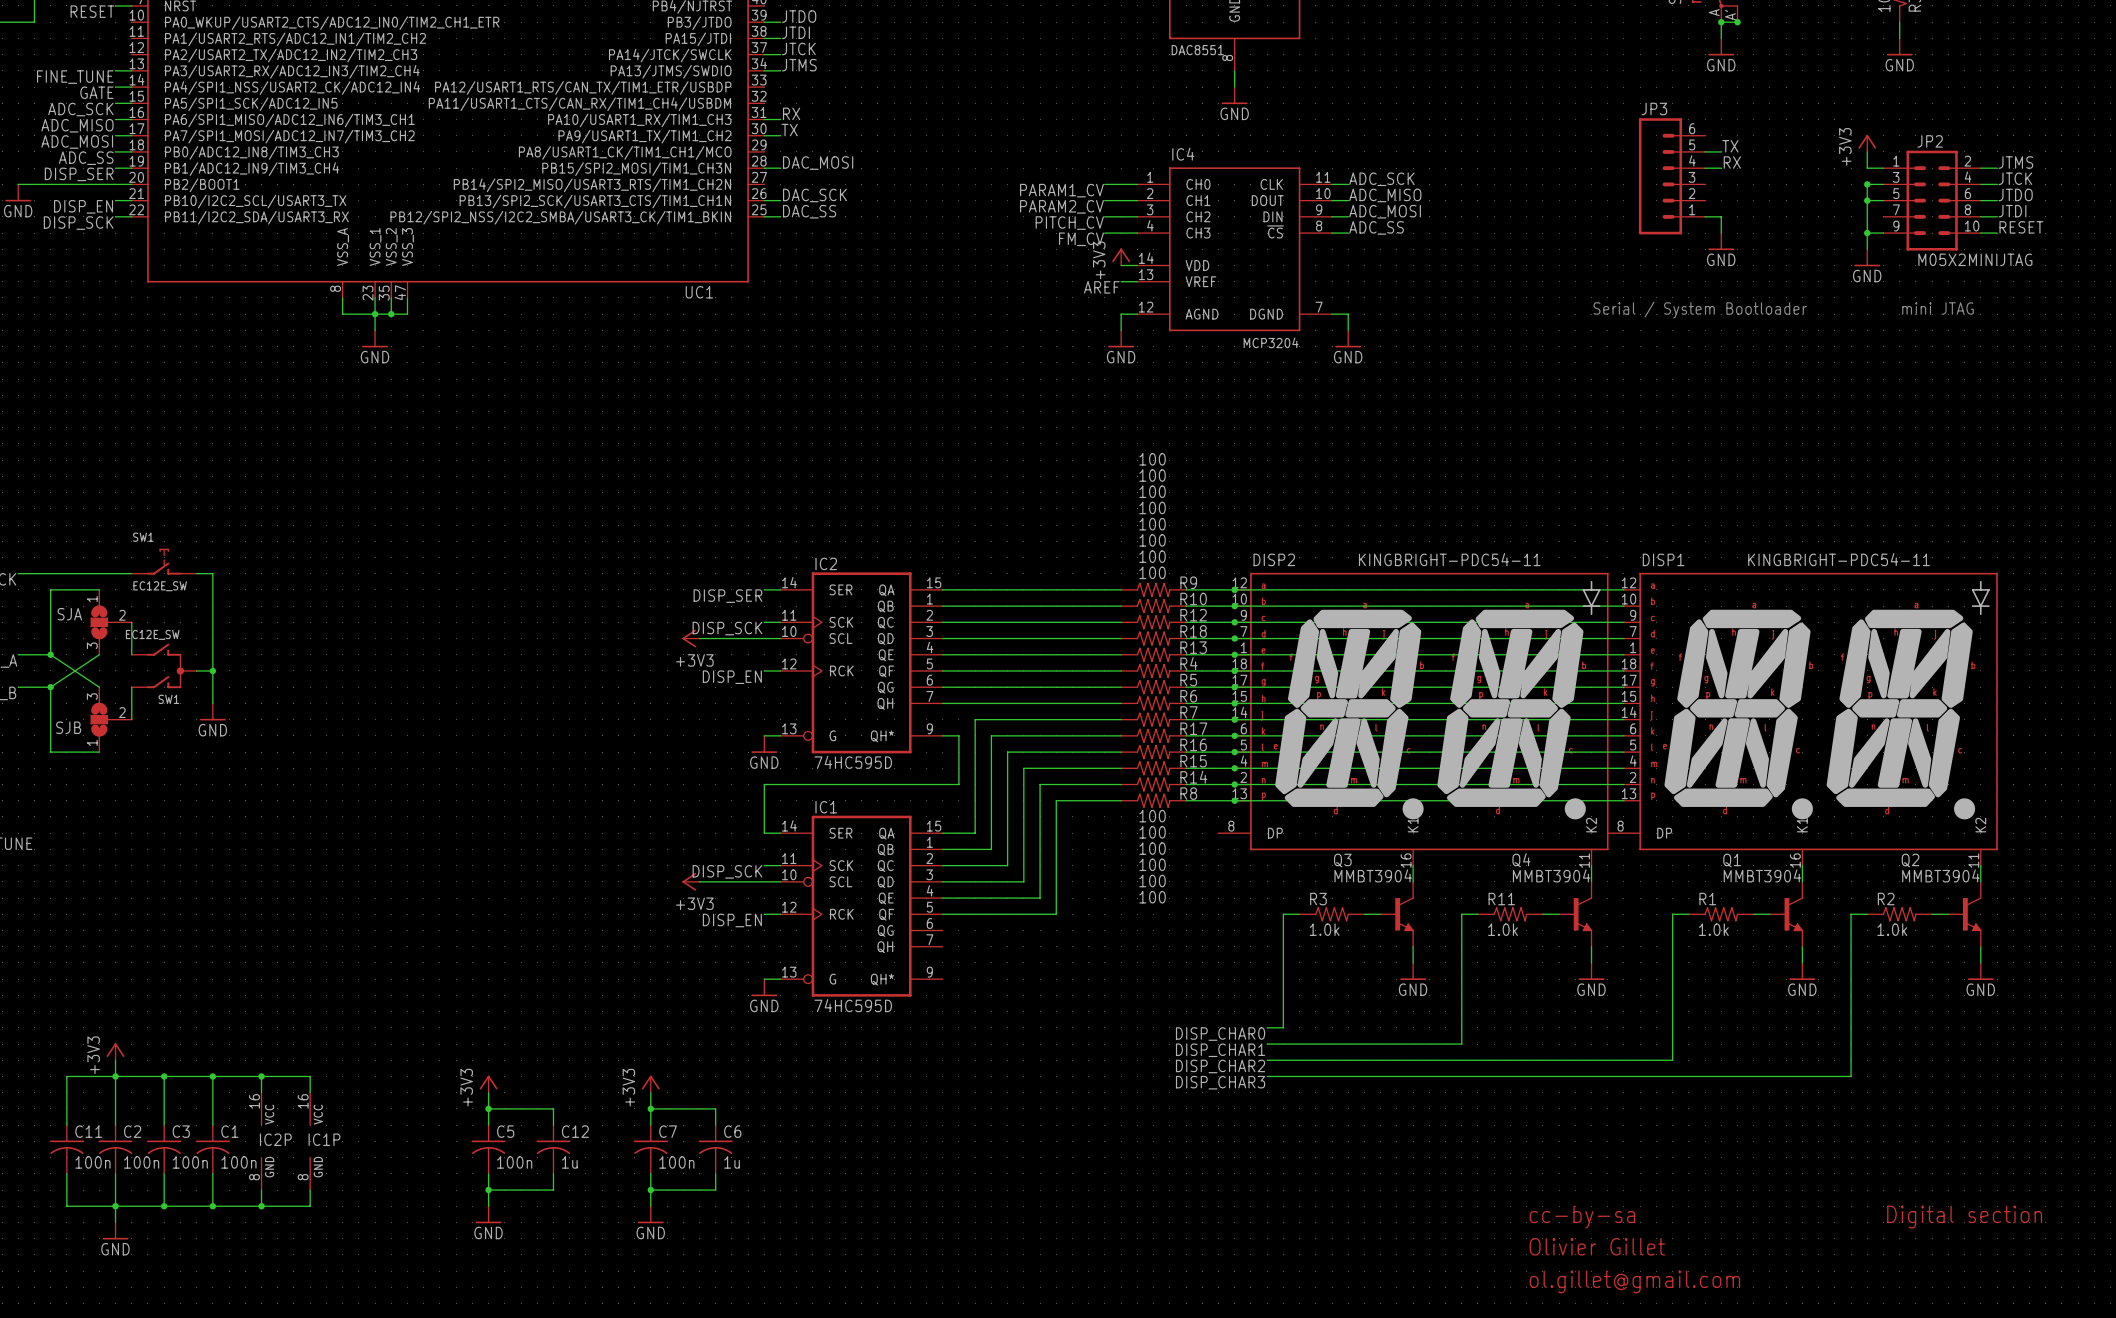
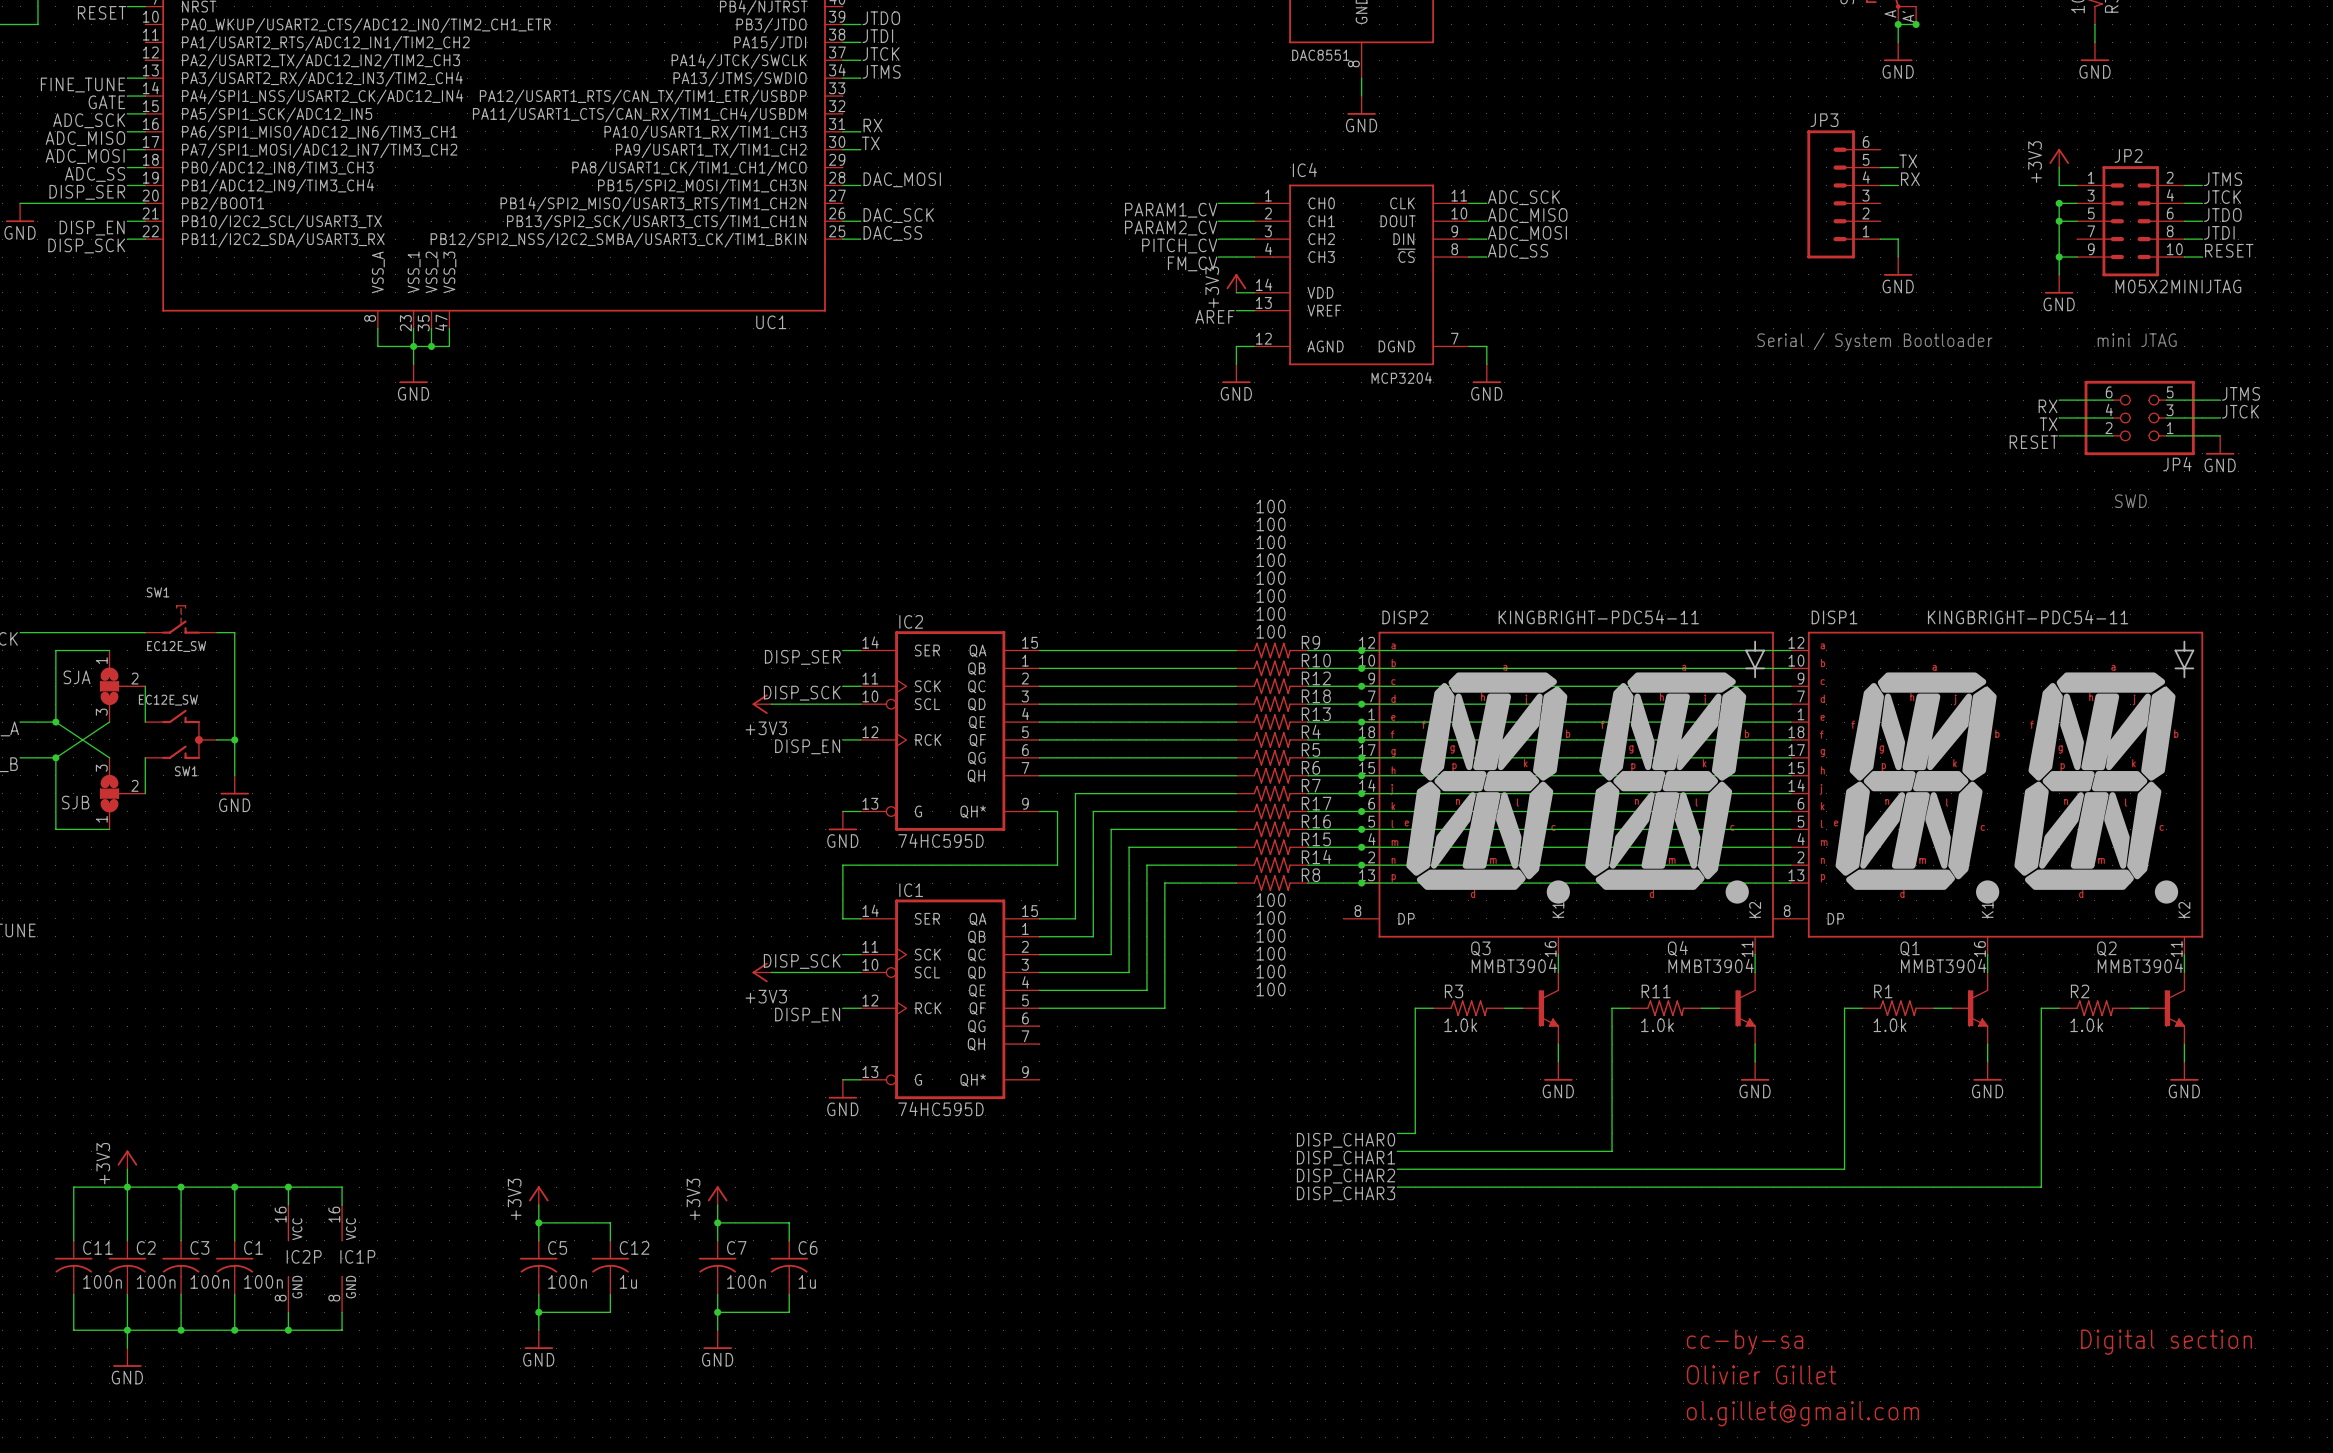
label: none -> JTMS (2240, 393)
wire: none -> (2059, 400) (2112, 400)
wire: none -> (2166, 400) (2220, 400)
label: none -> RX (2048, 406)
label: none -> JTCK (2240, 411)
wire: none -> (2059, 417) (2112, 417)
JP4: none -> (2139, 417)
wire: none -> (2166, 417) (2220, 417)
label: none -> TX (2048, 424)
wire: none -> (2059, 435) (2112, 435)
wire: none -> (2166, 435) (2220, 435)
label: none -> RESET (2033, 442)
power symbol: none -> GND (2220, 445)
text: none -> SWD (2130, 501)

